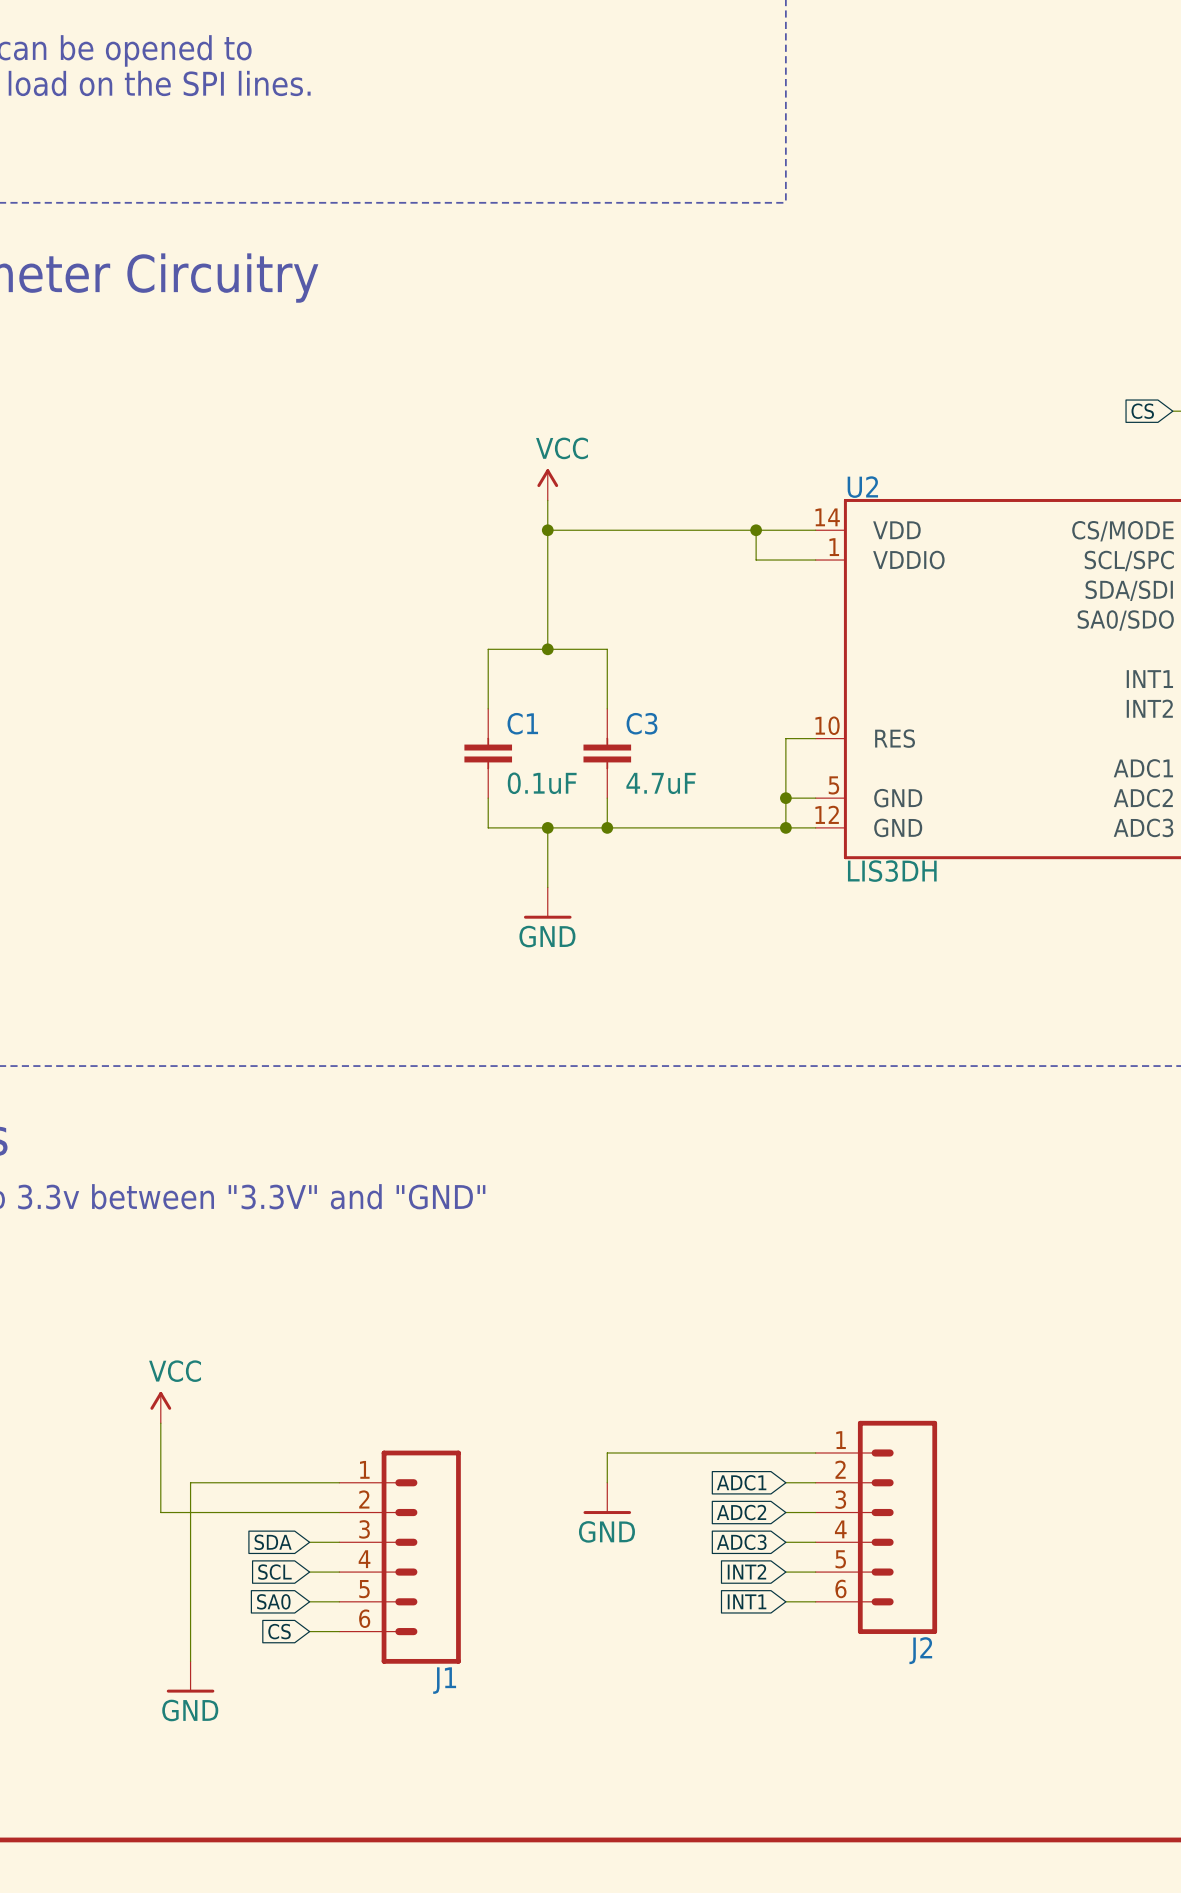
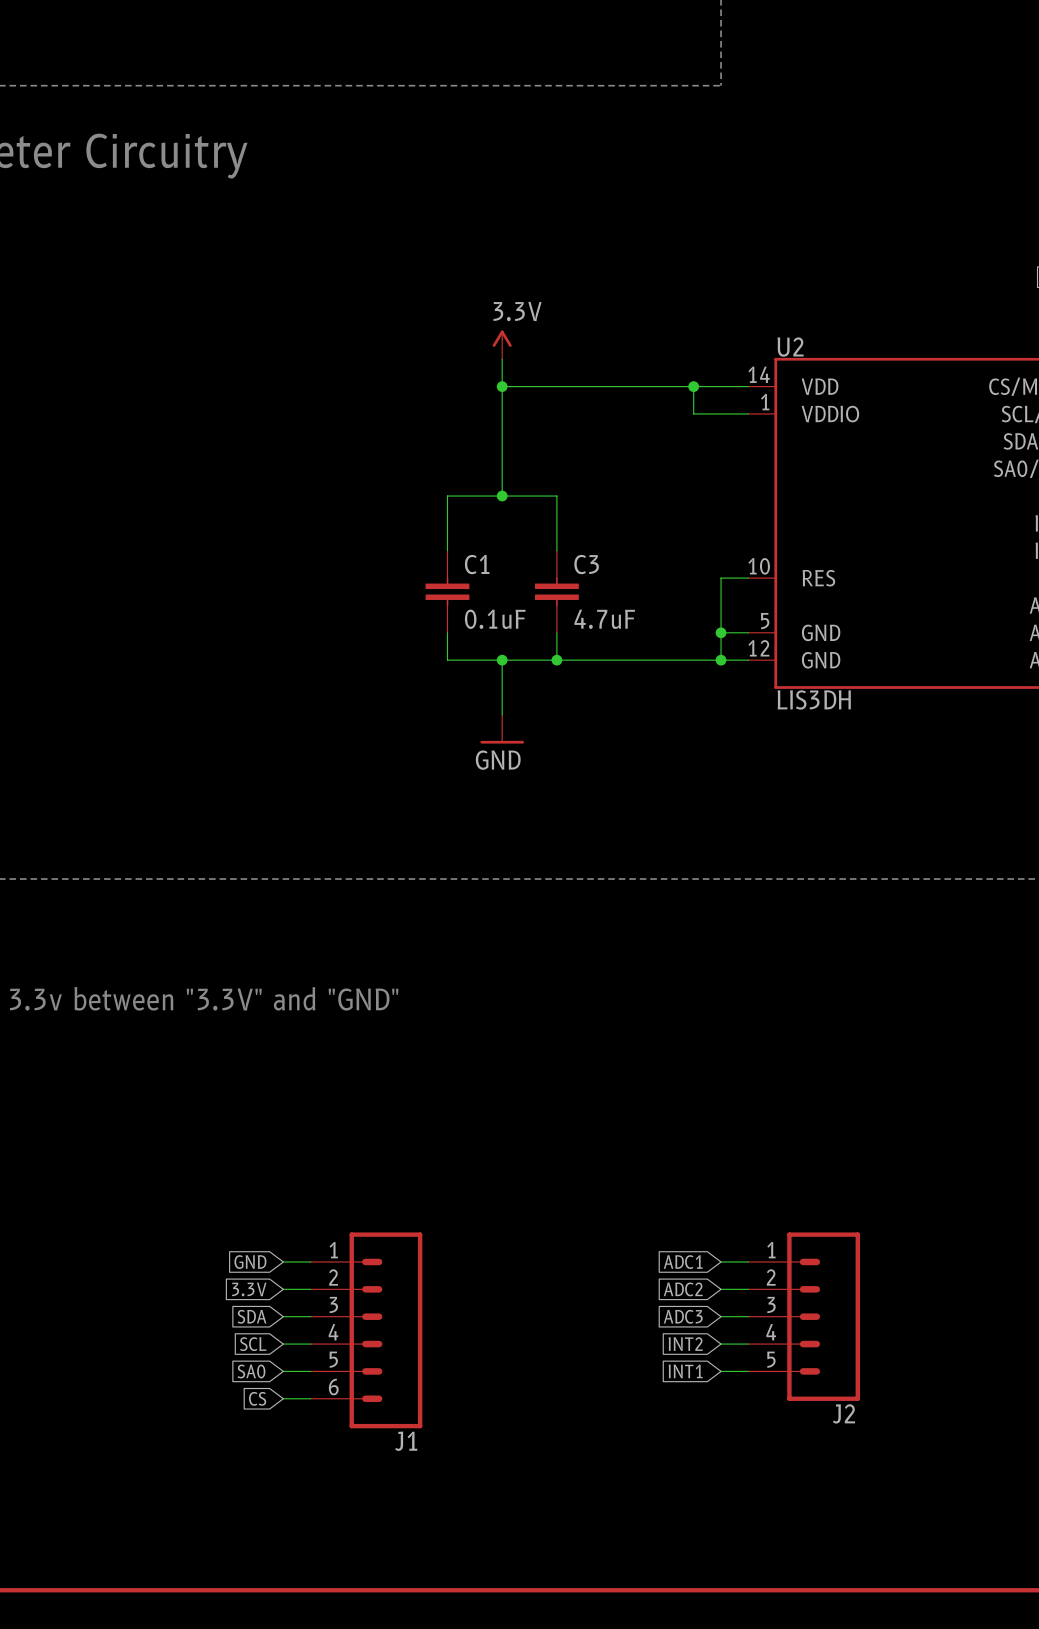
power symbol: VCC (547, 484) -> 3.3V (502, 344)
power symbol: VCC (160, 1407) -> none
J2 symbol: [815, 1420, 938, 1634] -> [748, 1232, 861, 1401]
wire: (160, 1423) (160, 1512) (309, 1512) -> none
wire: (815, 1452) (607, 1452) (607, 1482) -> none
global label: none -> GND (250, 1262)
wire: (309, 1482) (190, 1482) (190, 1661) -> none
power symbol: GND (607, 1498) -> none
global label: none -> 3.3V (249, 1289)
power symbol: GND (190, 1676) -> none

